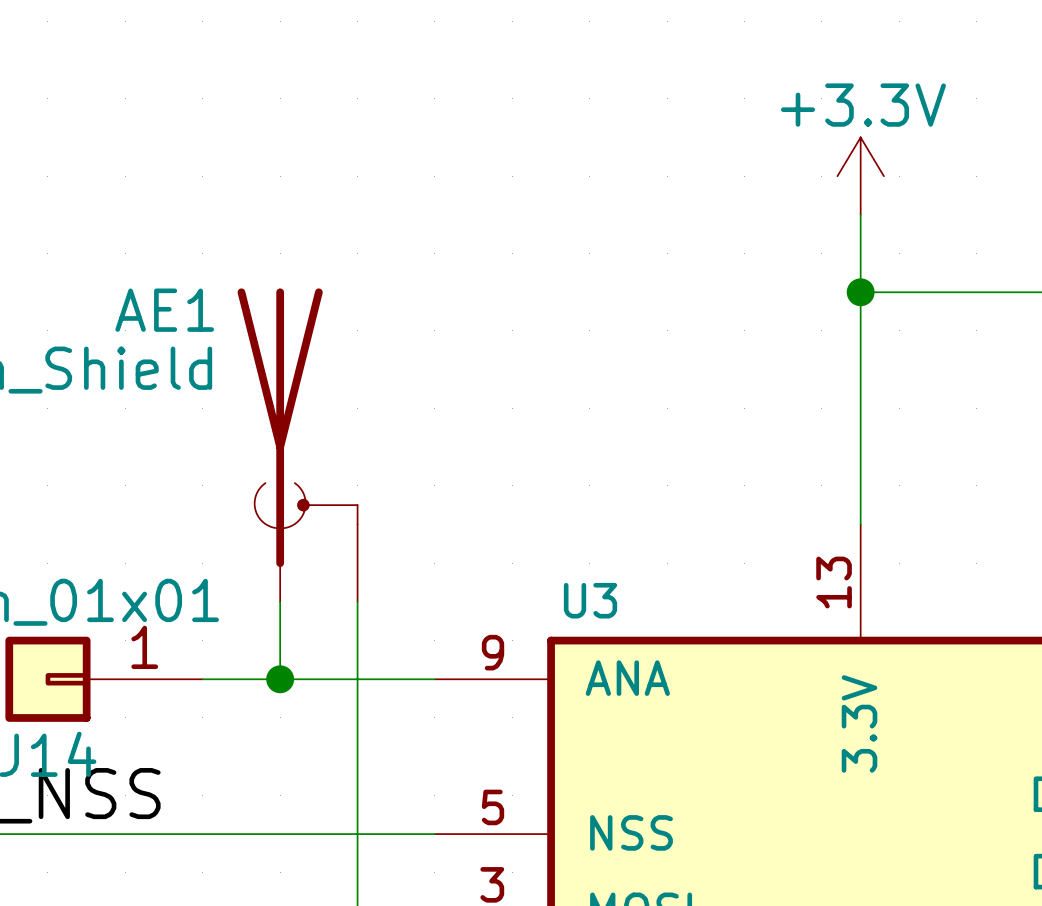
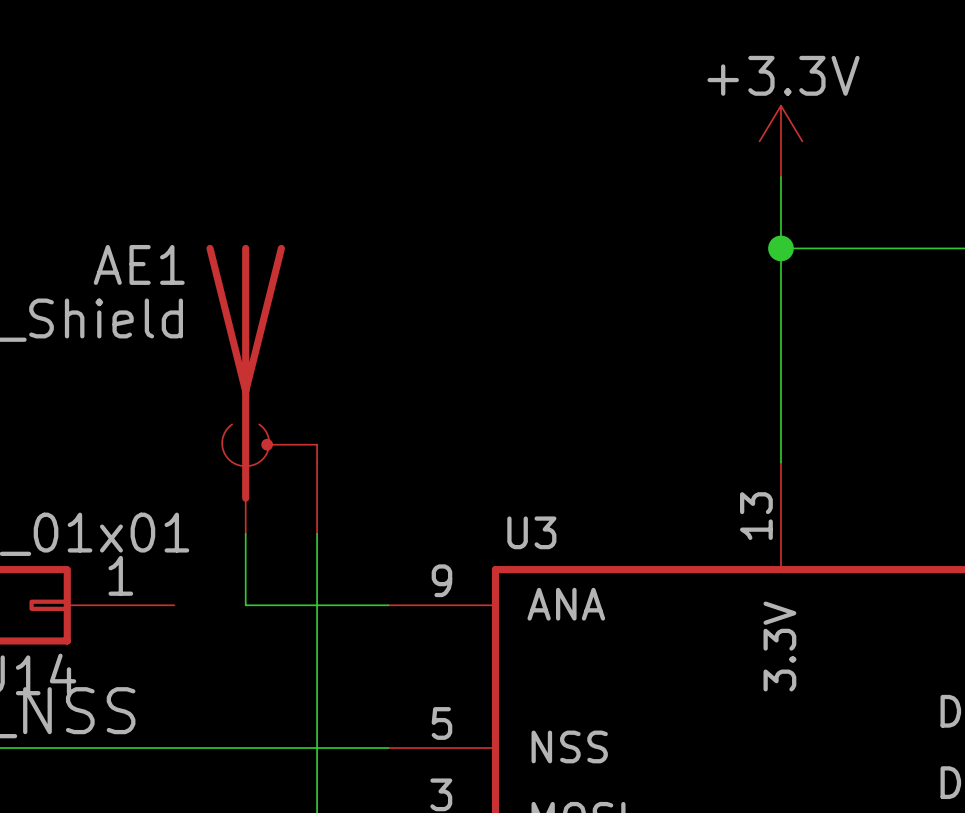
wire: (202, 679) (280, 679) -> none
junction: (280, 679) -> none

